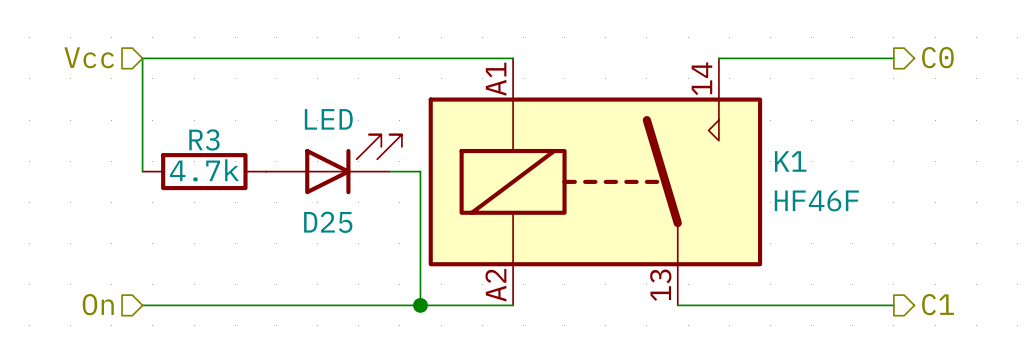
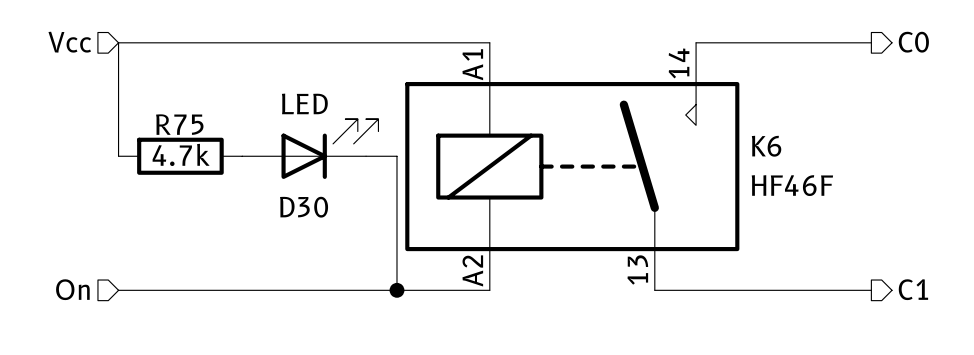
R3 name: R3 (204, 139) -> R75 (179, 124)
K1 name: K1 (790, 161) -> K6 (766, 146)
D25 name: D25 (328, 222) -> D30 (304, 207)

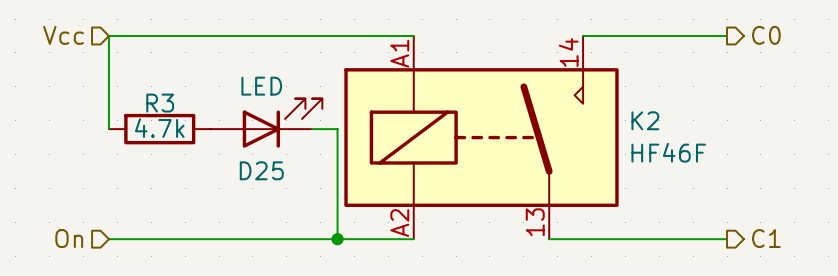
R75 name: R75 (179, 124) -> R3 (160, 103)
K6 name: K6 (766, 146) -> K2 (645, 120)
D30 name: D30 (304, 207) -> D25 (261, 170)

